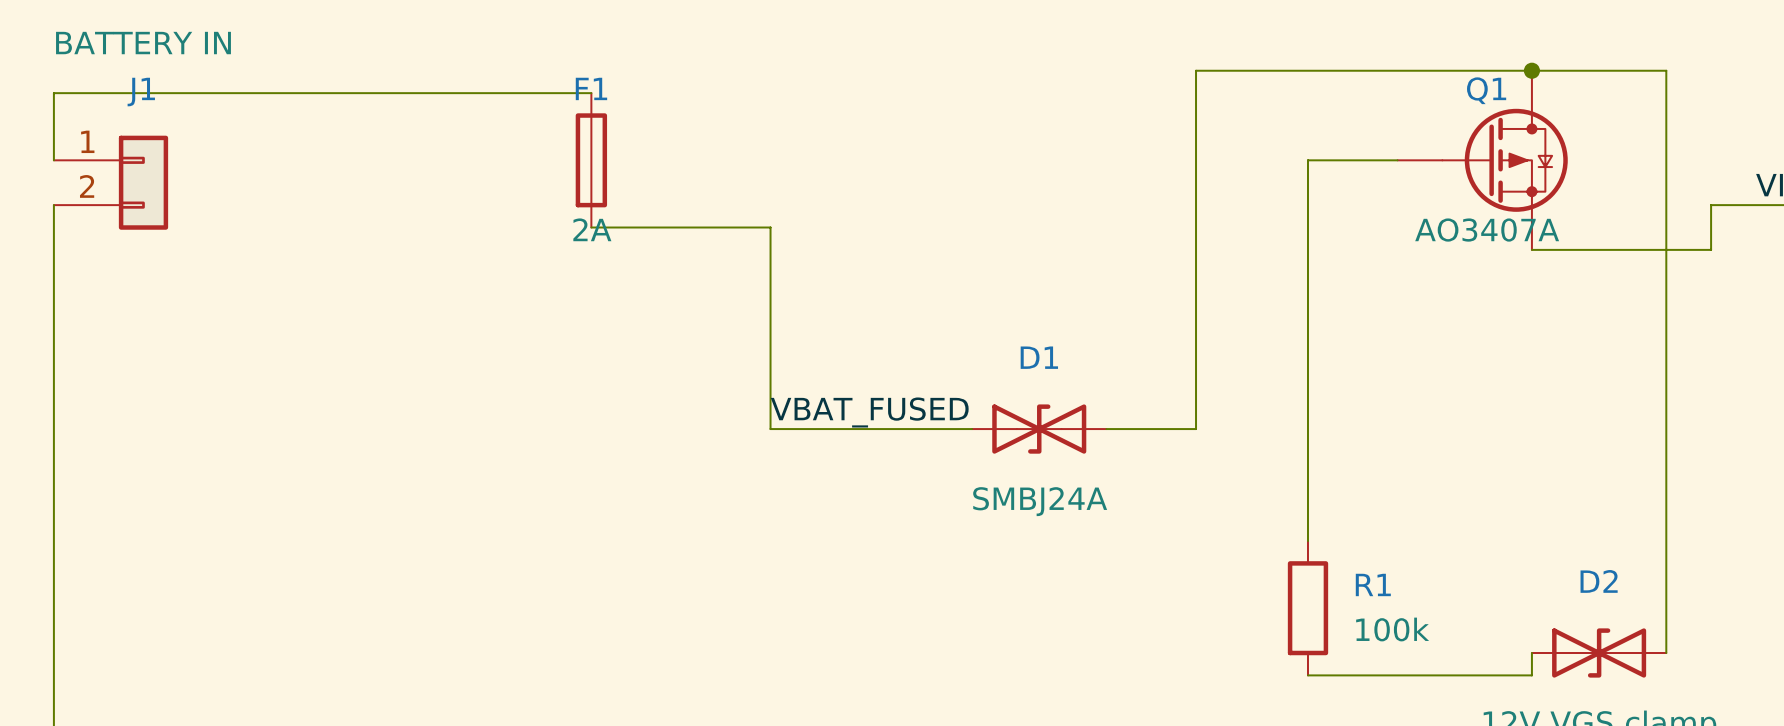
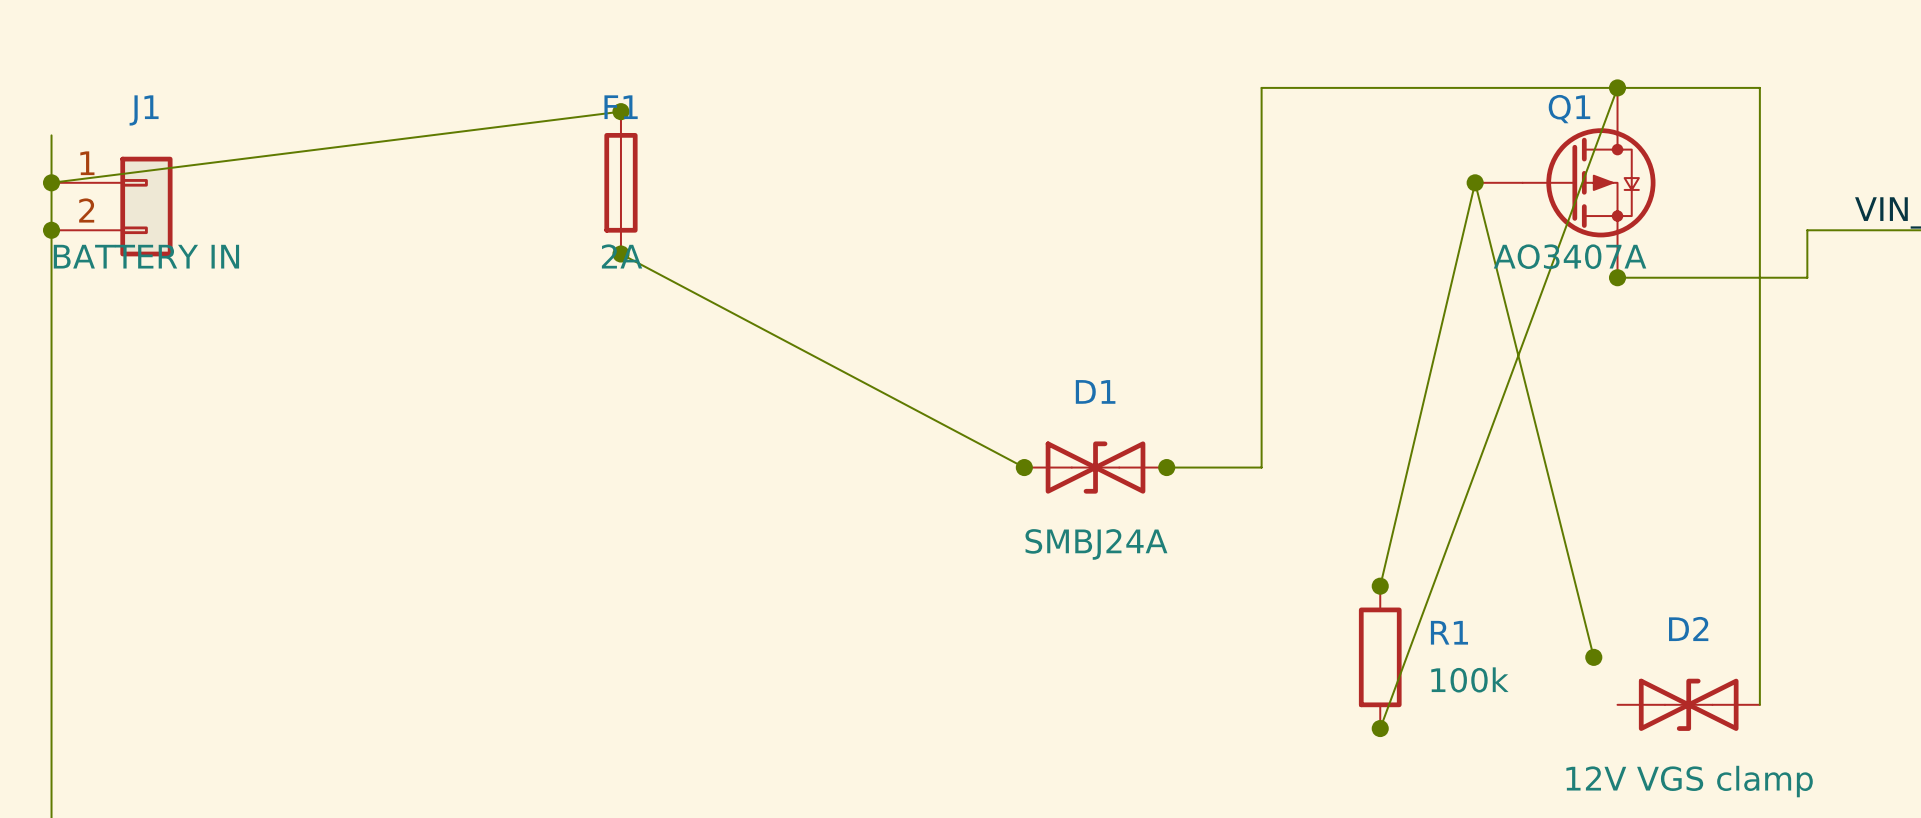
J1 value position: BATTERY IN (143, 43) -> BATTERY IN (146, 256)
wire: (591, 93) (53, 93) (53, 115) -> (620, 111) (51, 182) (51, 230)
junction: none -> (620, 111)
junction: none -> (51, 182)
wire: (1397, 160) (1307, 160) (1307, 541) -> (1593, 657) (1475, 182) (1380, 586)
junction: none -> (1475, 182)
junction: none -> (51, 230)
wire: (591, 227) (770, 227) (770, 429) (972, 429) -> (620, 254) (1024, 467)
junction: none -> (620, 254)
junction: none -> (1617, 277)
label: VBAT_FUSED (869, 412) -> none
junction: none -> (1024, 467)
junction: none -> (1166, 467)
junction: none -> (1380, 586)
junction: none -> (1593, 657)
wire: (1531, 652) (1531, 675) (1307, 675) -> (1617, 87) (1380, 728)
junction: none -> (1380, 728)

